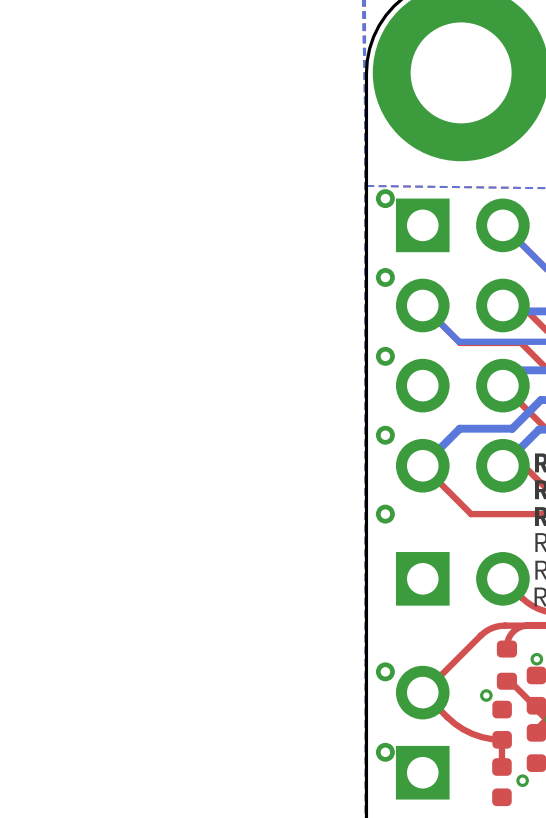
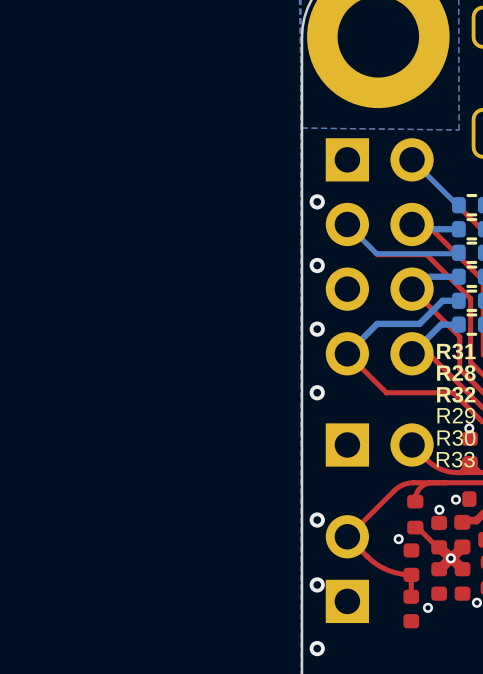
via: (385, 198) -> none

